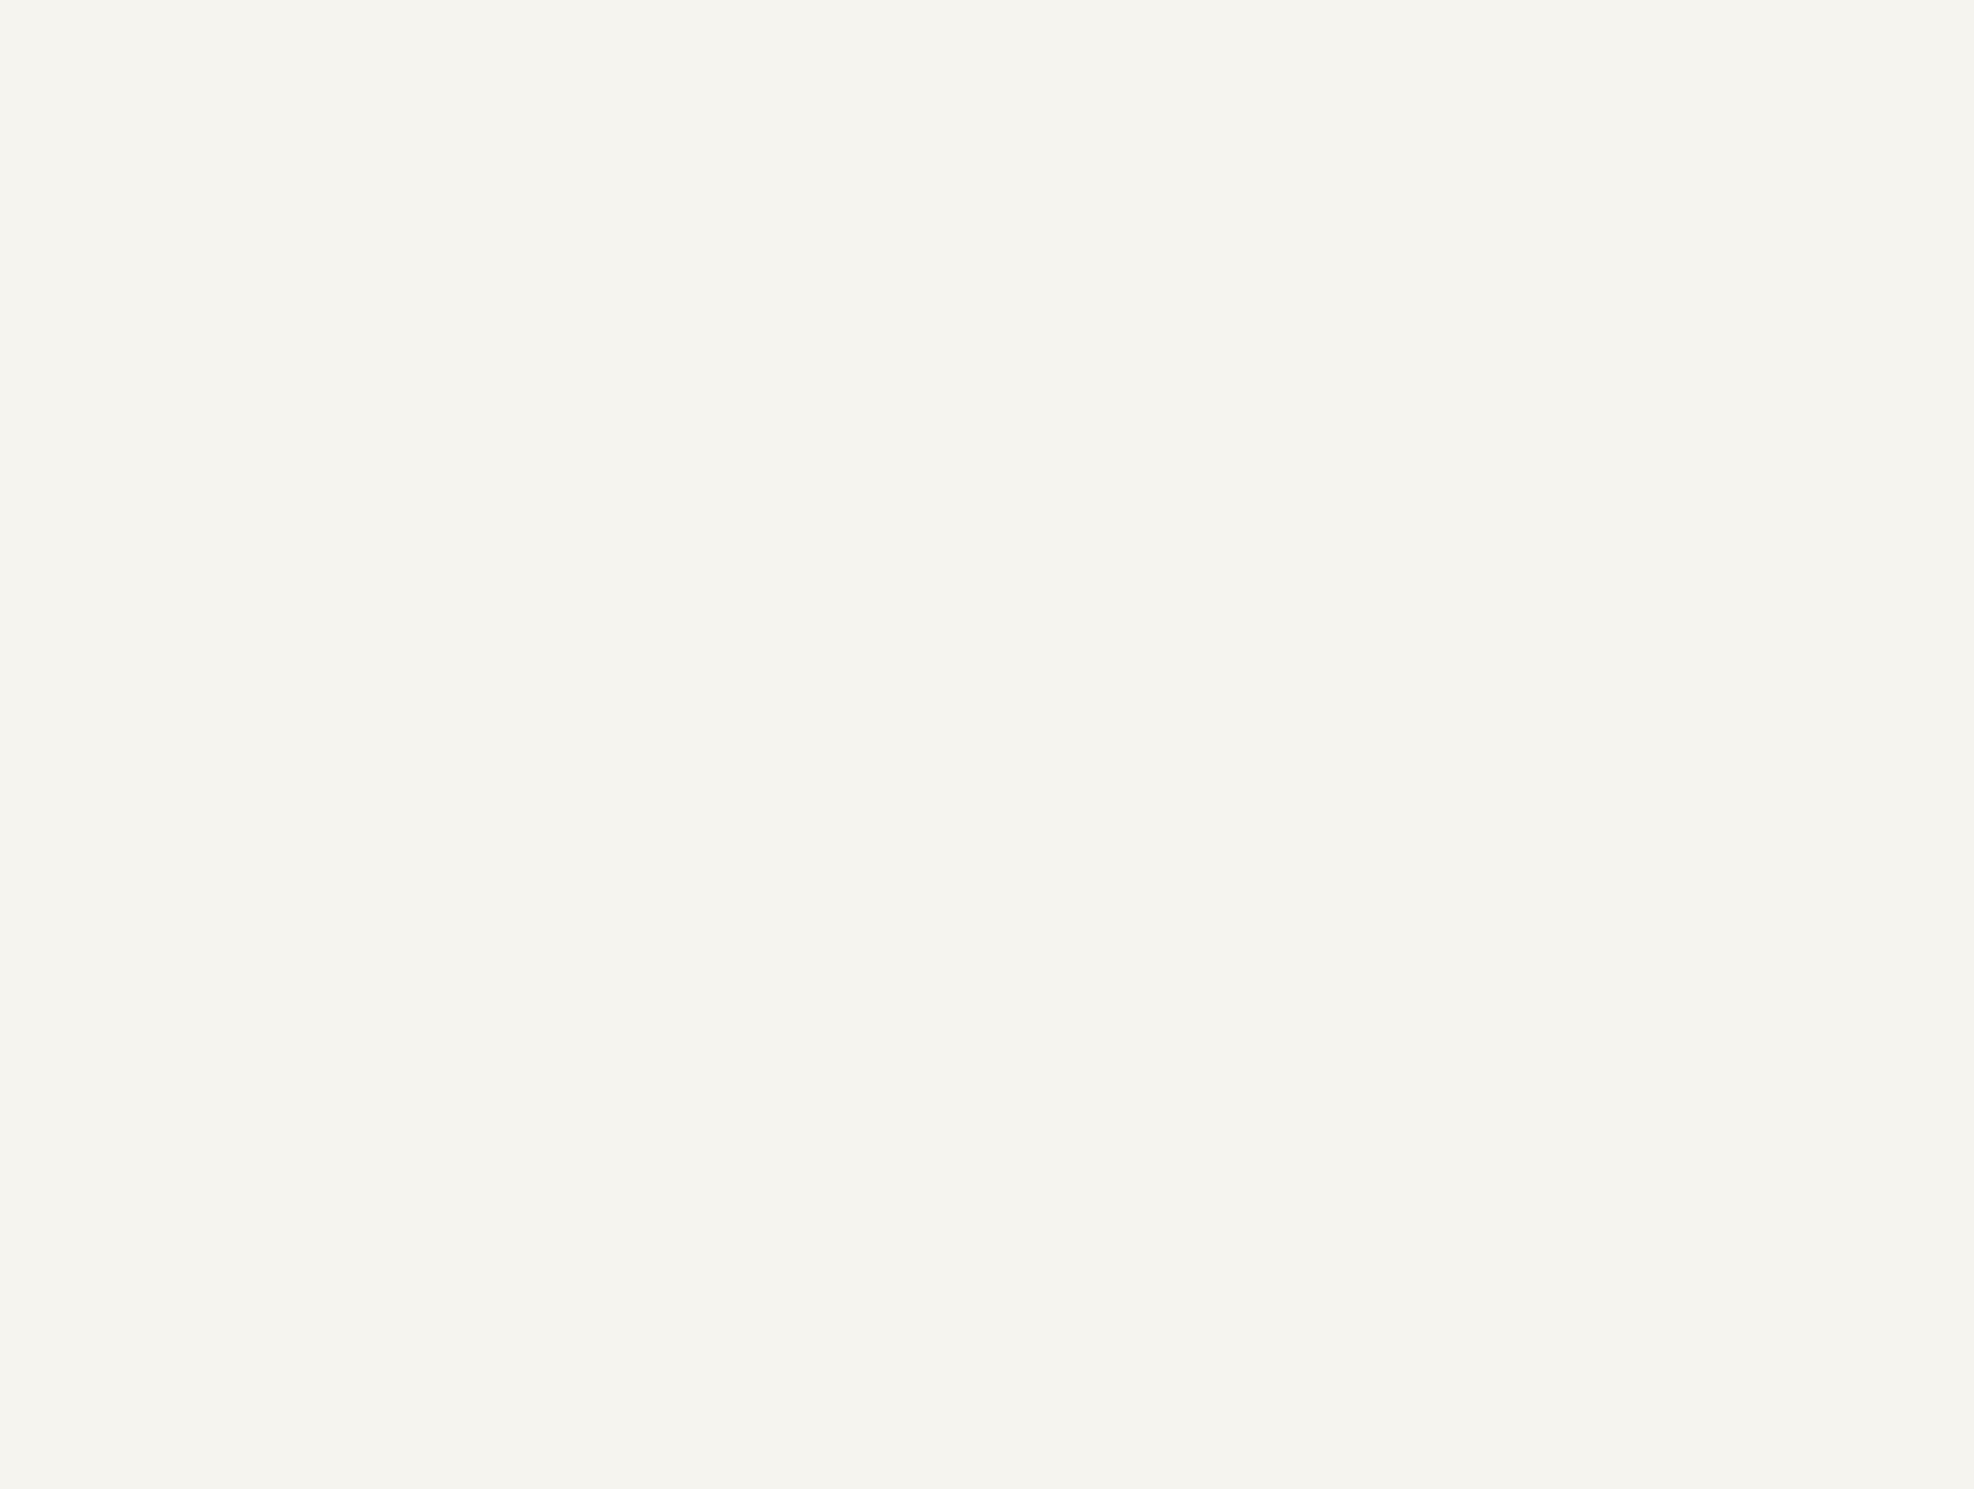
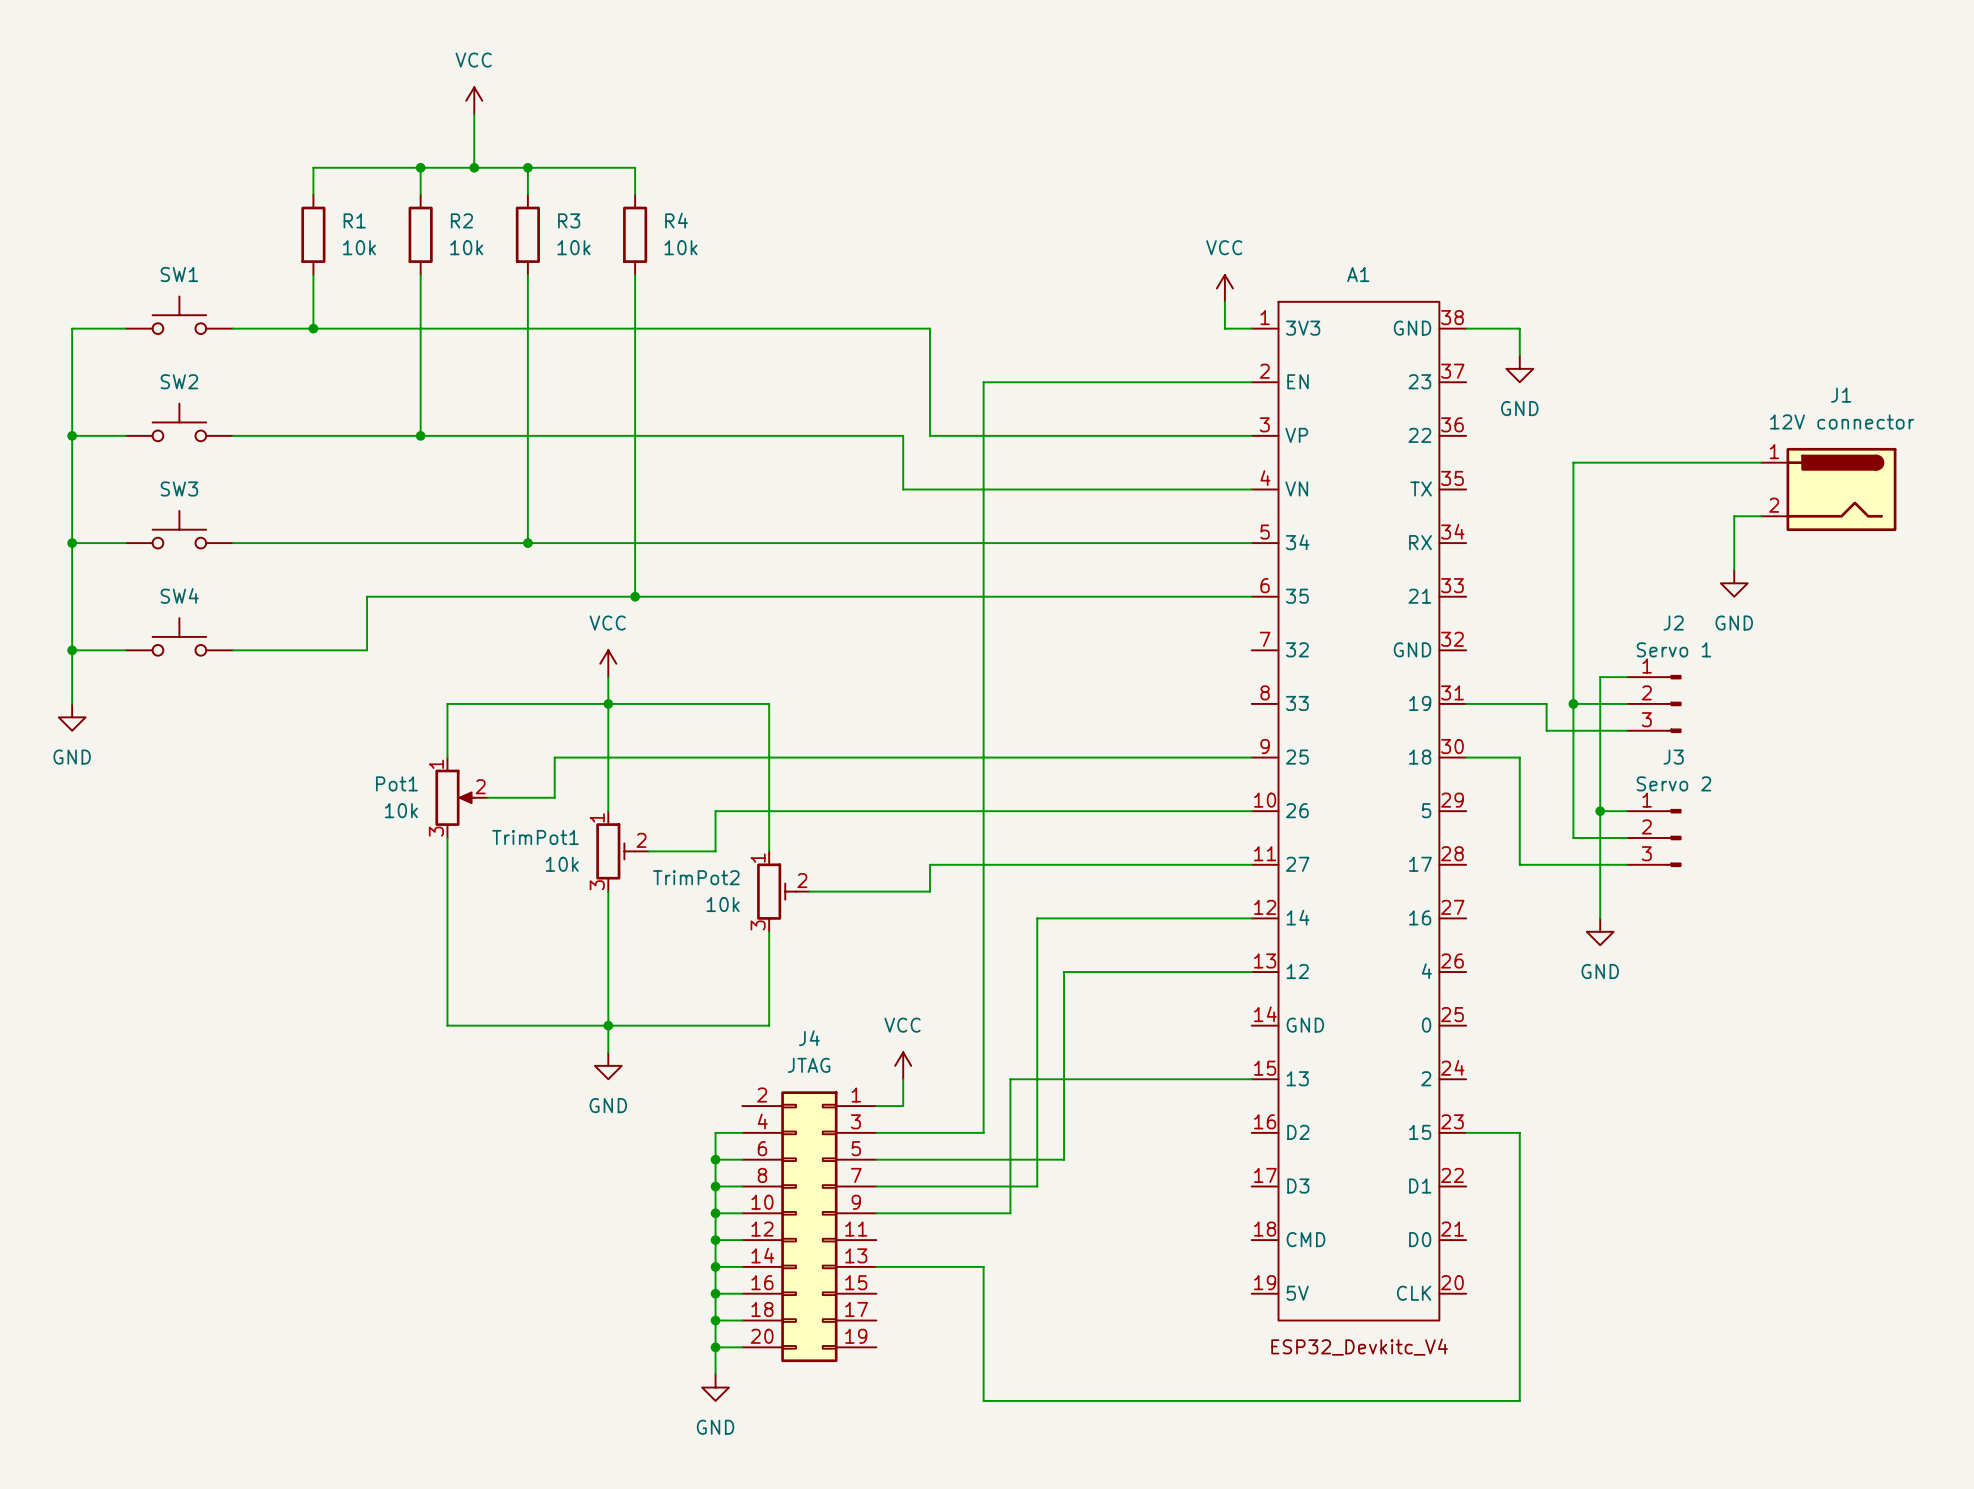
power symbol: none -> VCC (474, 100)
wire: none -> (474, 114) (474, 167)
wire: none -> (420, 167) (420, 194)
junction: none -> (420, 167)
junction: none -> (474, 167)
wire: none -> (527, 167) (527, 194)
junction: none -> (527, 167)
wire: none -> (313, 194) (313, 167) (635, 167) (635, 194)
R1: none -> 10k (313, 234)
R2: none -> 10k (420, 234)
R3: none -> 10k (527, 234)
R4: none -> 10k (635, 234)
wire: none -> (313, 275) (313, 328)
wire: none -> (420, 275) (420, 435)
wire: none -> (527, 275) (527, 543)
wire: none -> (635, 275) (635, 596)
power symbol: none -> VCC (1224, 288)
wire: none -> (1224, 301) (1224, 328) (1251, 328)
SW1: none -> (179, 315)
wire: none -> (125, 328) (72, 328) (72, 703)
wire: none -> (233, 328) (930, 328) (930, 435) (1251, 435)
junction: none -> (313, 328)
wire: none -> (1466, 328) (1519, 328) (1519, 355)
power symbol: none -> GND (1519, 368)
wire: none -> (1251, 382) (983, 382) (983, 1132) (876, 1132)
SW2: none -> (179, 422)
wire: none -> (72, 435) (125, 435)
junction: none -> (72, 435)
wire: none -> (233, 435) (903, 435) (903, 489) (1251, 489)
junction: none -> (420, 435)
wire: none -> (1761, 462) (1573, 462) (1573, 837) (1627, 837)
J1: none -> 12V connector (1828, 489)
wire: none -> (1761, 516) (1734, 516) (1734, 569)
SW3: none -> (179, 529)
wire: none -> (72, 543) (125, 543)
junction: none -> (72, 543)
wire: none -> (233, 543) (1251, 543)
junction: none -> (527, 543)
power symbol: none -> GND (1734, 583)
junction: none -> (635, 596)
wire: none -> (1251, 596) (367, 596) (367, 650) (233, 650)
SW4: none -> (179, 636)
wire: none -> (72, 650) (125, 650)
junction: none -> (72, 650)
power symbol: none -> VCC (608, 663)
wire: none -> (608, 677) (608, 811)
wire: none -> (1627, 677) (1600, 677) (1600, 918)
junction: none -> (608, 703)
wire: none -> (1466, 703) (1546, 703) (1546, 730) (1627, 730)
wire: none -> (1573, 703) (1627, 703)
junction: none -> (1573, 703)
J2: none -> Servo 1 (1654, 703)
power symbol: none -> GND (72, 717)
wire: none -> (447, 757) (447, 703) (769, 703) (769, 851)
wire: none -> (1251, 757) (554, 757) (554, 797) (487, 797)
wire: none -> (1466, 757) (1519, 757) (1519, 864) (1627, 864)
Pot1: none -> 10k (461, 797)
wire: none -> (1251, 811) (715, 811) (715, 851) (648, 851)
A1: none -> (1358, 811)
wire: none -> (1600, 811) (1627, 811)
junction: none -> (1600, 811)
wire: none -> (447, 837) (447, 1025) (769, 1025) (769, 931)
J3: none -> Servo 2 (1654, 837)
TrimPot1: none -> 10k (622, 851)
wire: none -> (1251, 864) (930, 864) (930, 891) (809, 891)
wire: none -> (608, 891) (608, 1052)
TrimPot2: none -> 10k (783, 891)
wire: none -> (1251, 918) (1037, 918) (1037, 1186) (876, 1186)
power symbol: none -> GND (1600, 931)
wire: none -> (1251, 972) (1064, 972) (1064, 1159) (876, 1159)
junction: none -> (608, 1025)
power symbol: none -> GND (608, 1065)
power symbol: none -> VCC (903, 1065)
wire: none -> (903, 1079) (903, 1106) (876, 1106)
wire: none -> (1251, 1079) (1010, 1079) (1010, 1213) (876, 1213)
wire: none -> (742, 1132) (715, 1132) (715, 1374)
wire: none -> (1466, 1132) (1519, 1132) (1519, 1400) (983, 1400) (983, 1266) (876, 1266)
wire: none -> (715, 1159) (742, 1159)
junction: none -> (715, 1159)
wire: none -> (715, 1186) (742, 1186)
junction: none -> (715, 1186)
wire: none -> (715, 1213) (742, 1213)
junction: none -> (715, 1213)
J4: none -> JTAG (809, 1226)
wire: none -> (715, 1240) (742, 1240)
junction: none -> (715, 1240)
wire: none -> (715, 1266) (742, 1266)
junction: none -> (715, 1266)
wire: none -> (715, 1293) (742, 1293)
junction: none -> (715, 1293)
wire: none -> (715, 1320) (742, 1320)
junction: none -> (715, 1320)
wire: none -> (715, 1347) (742, 1347)
junction: none -> (715, 1347)
power symbol: none -> GND (715, 1387)

